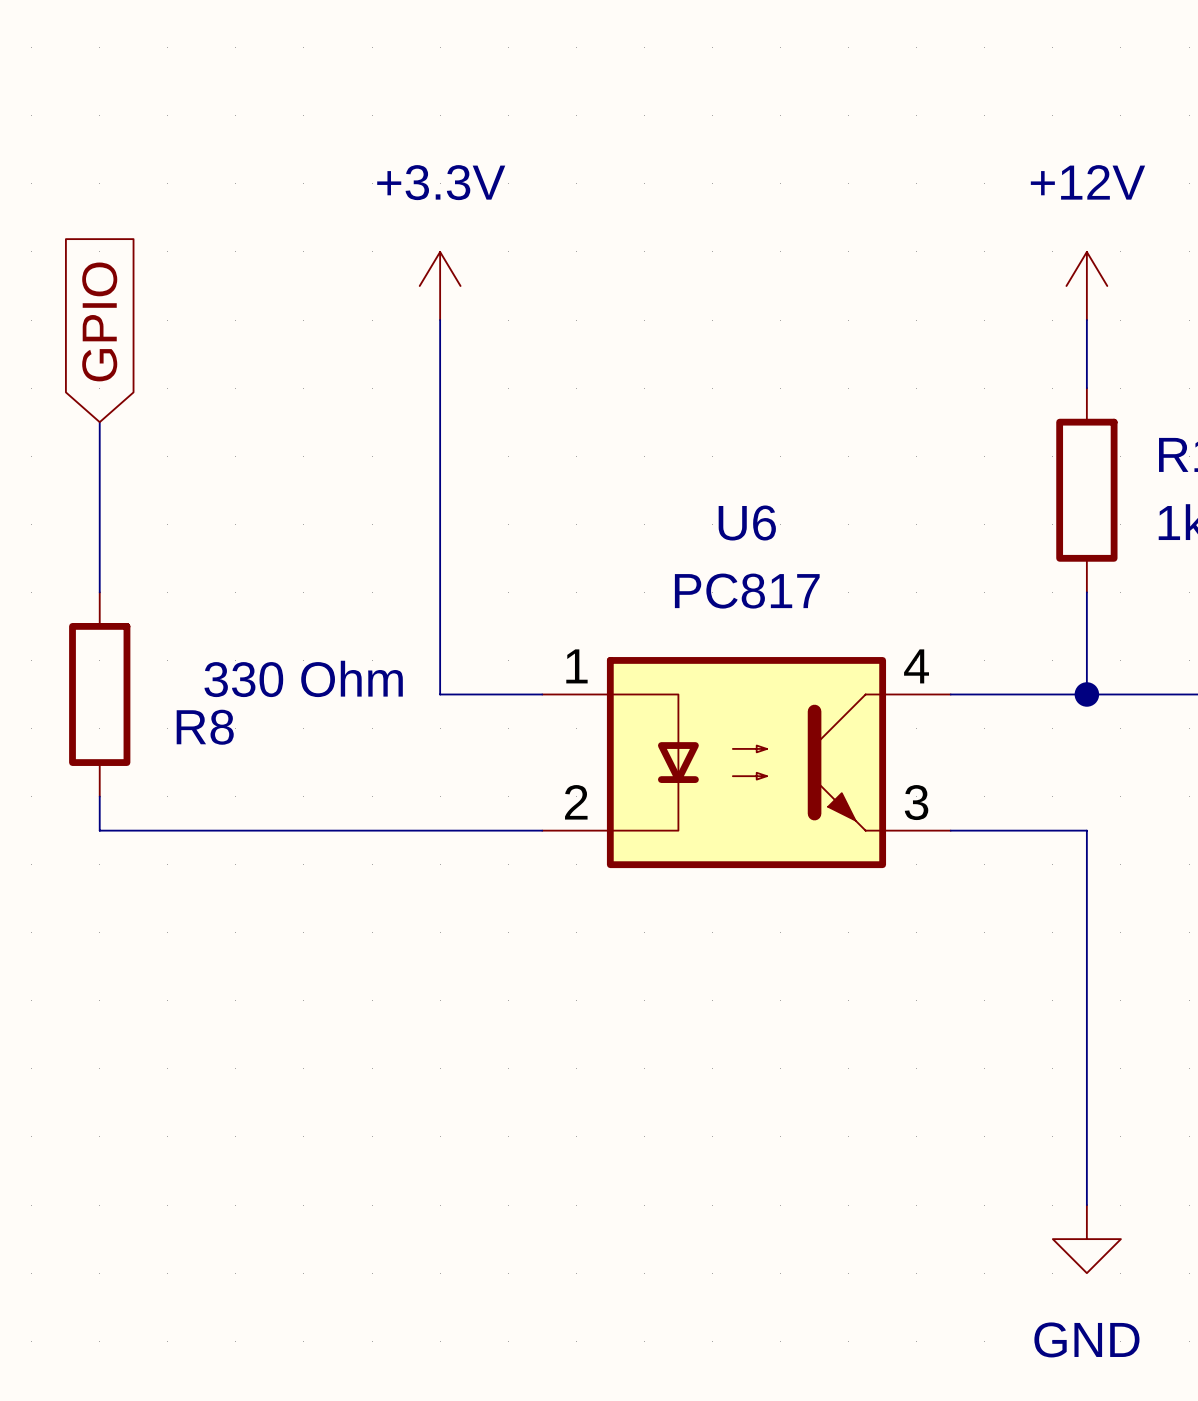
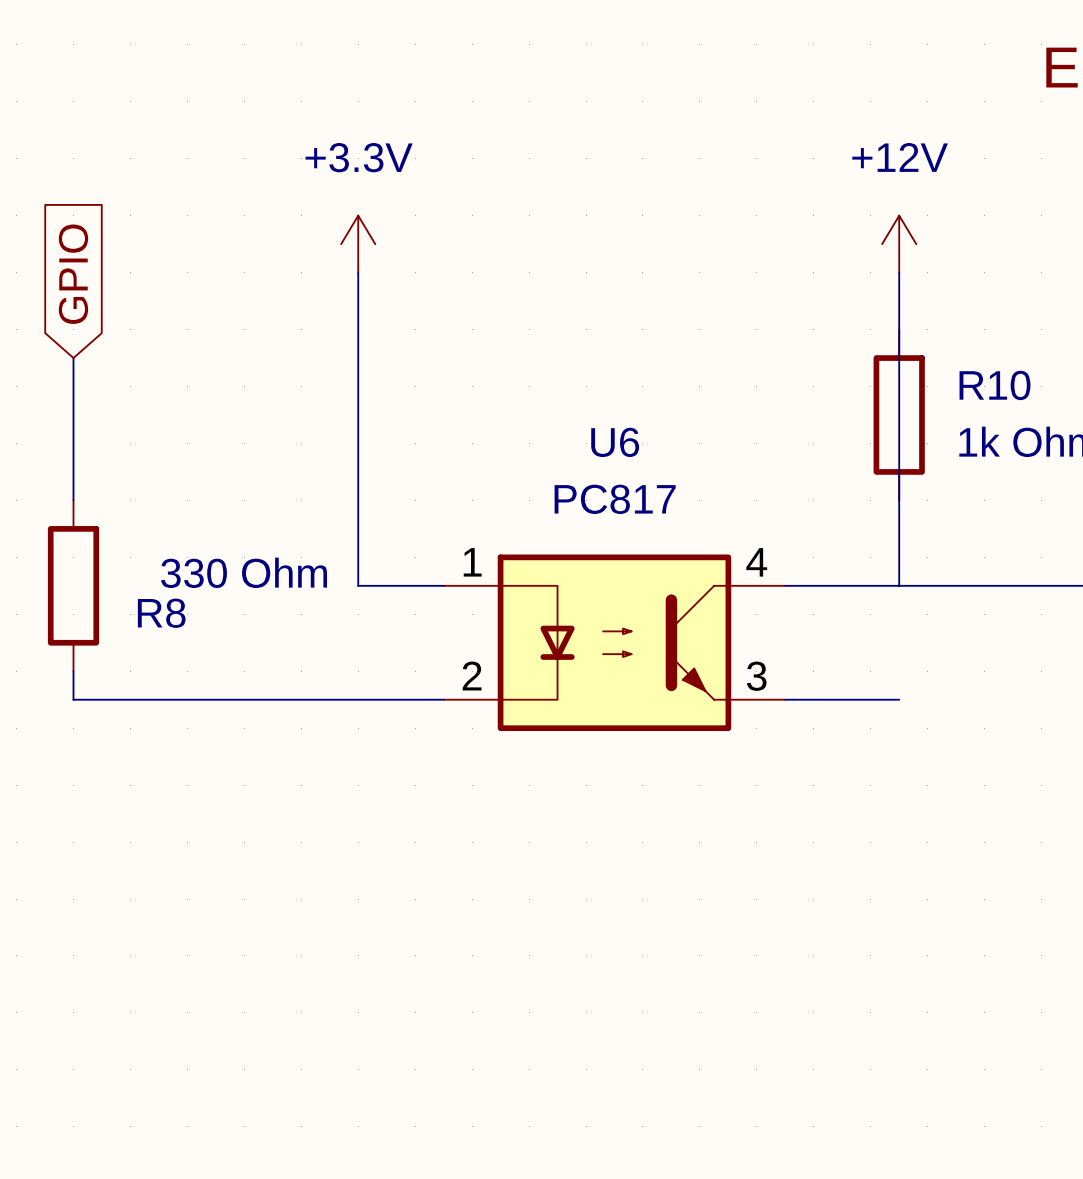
wire: none -> (899, 329) (899, 500)
junction: (1086, 694) -> none
wire: (1086, 830) (1086, 1205) -> none
power symbol: GND (1086, 1239) -> none

